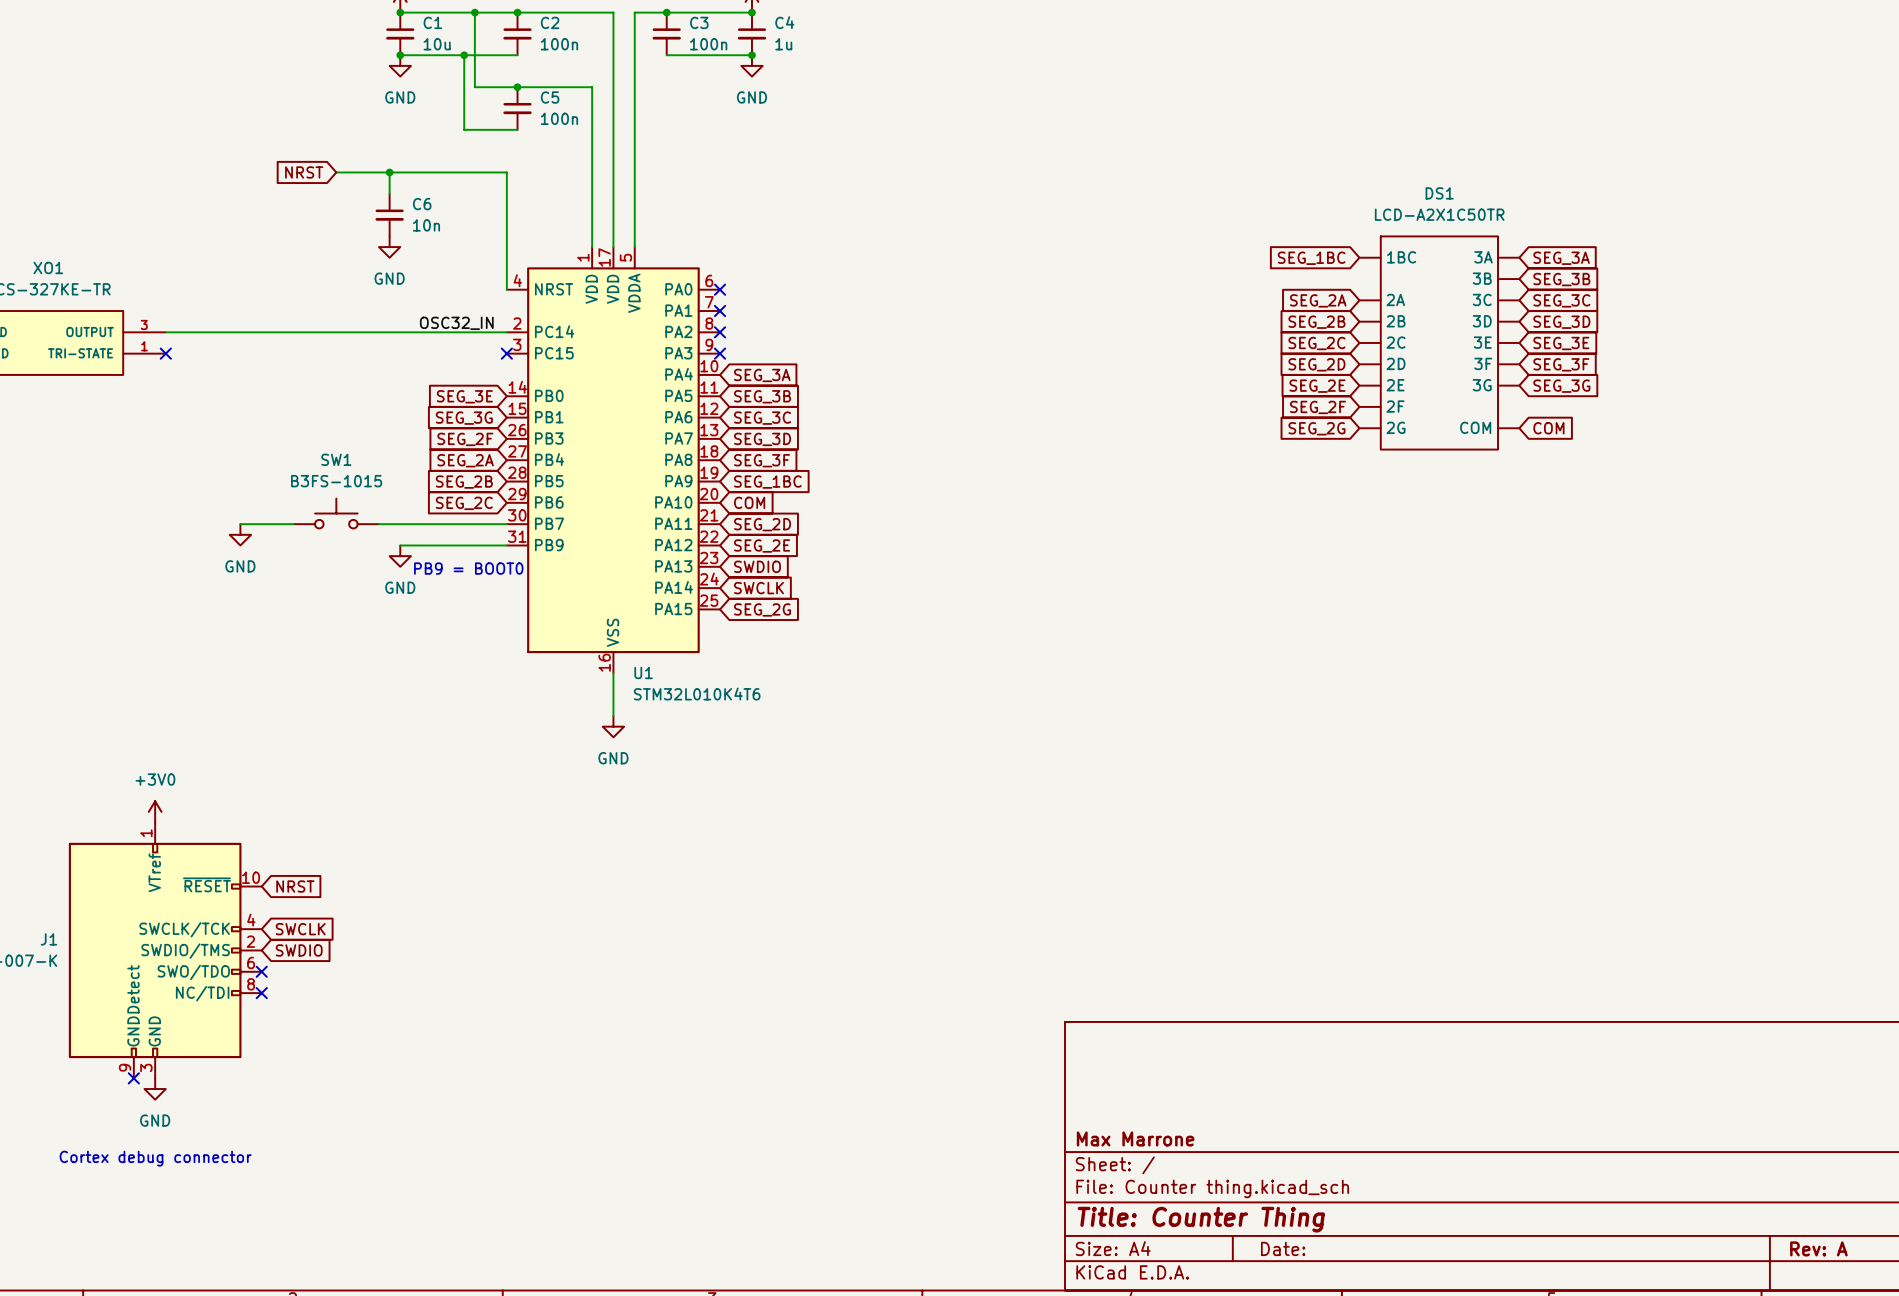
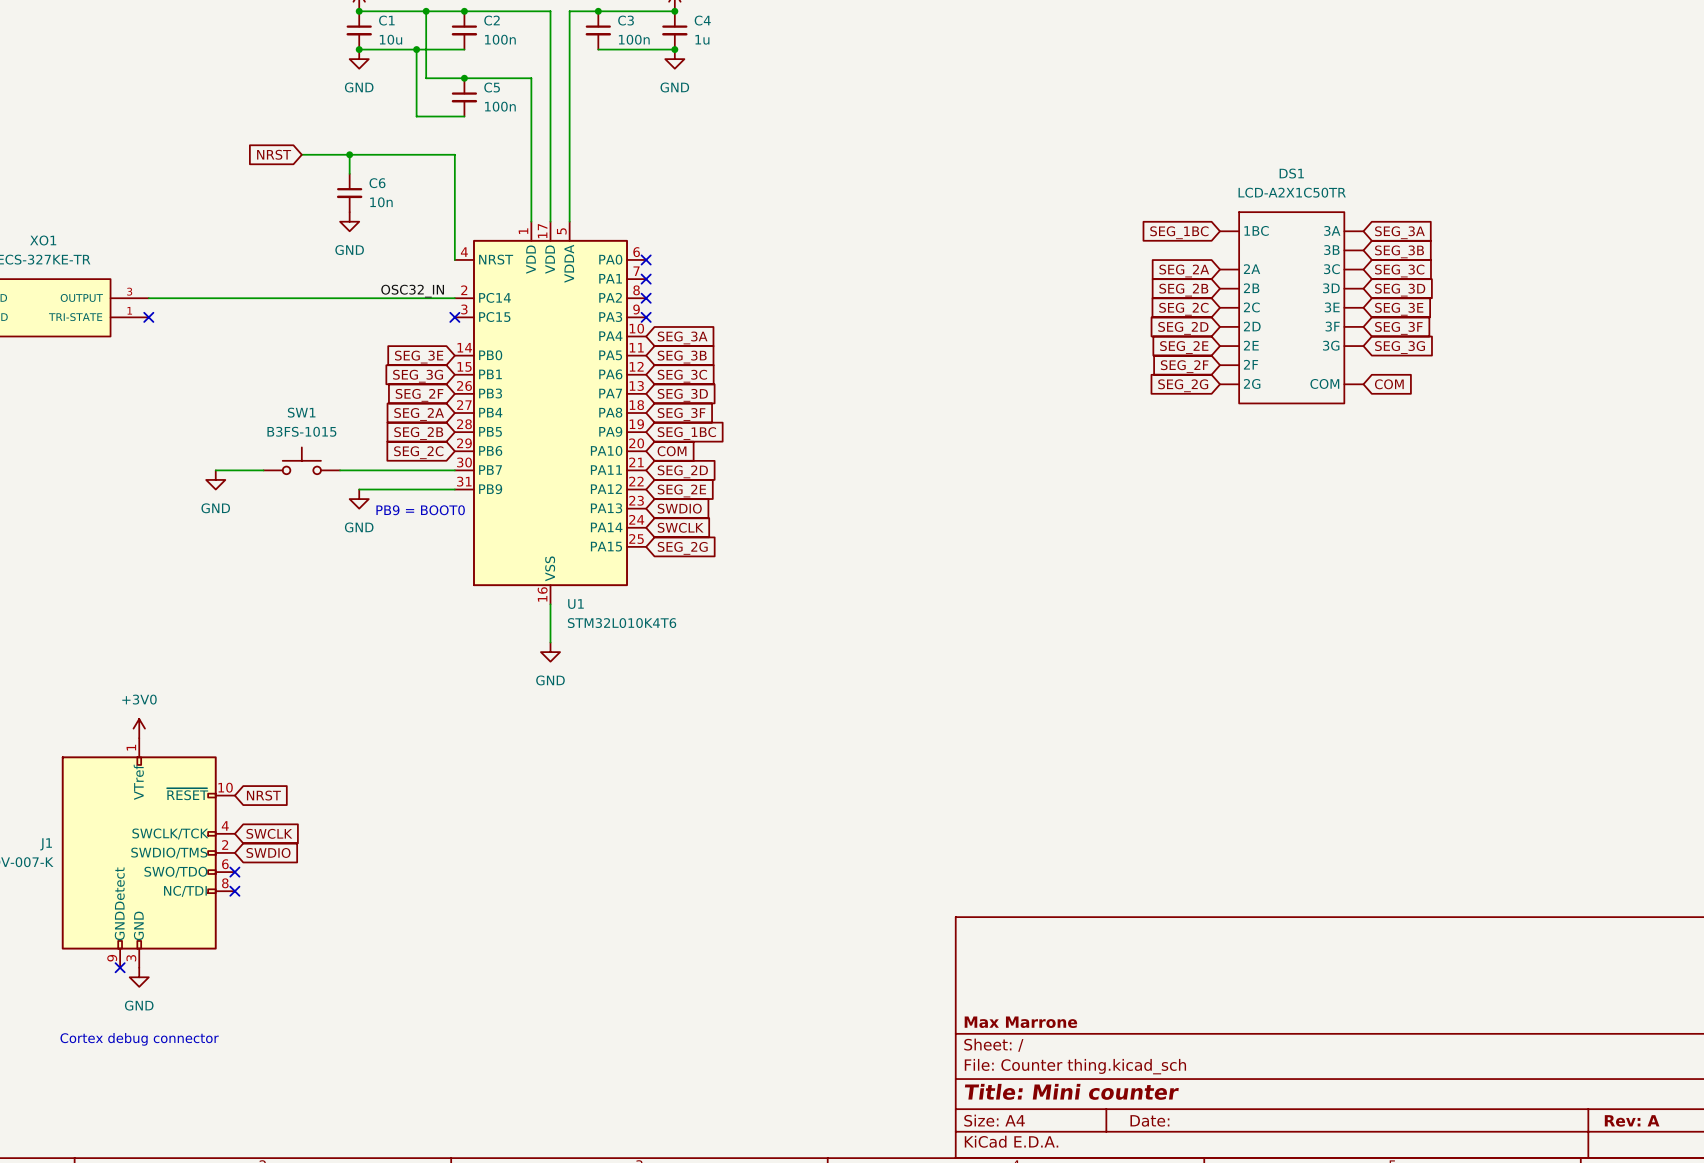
title block: Title: Counter Thing (1201, 1219) -> Title: Mini counter (1071, 1091)

